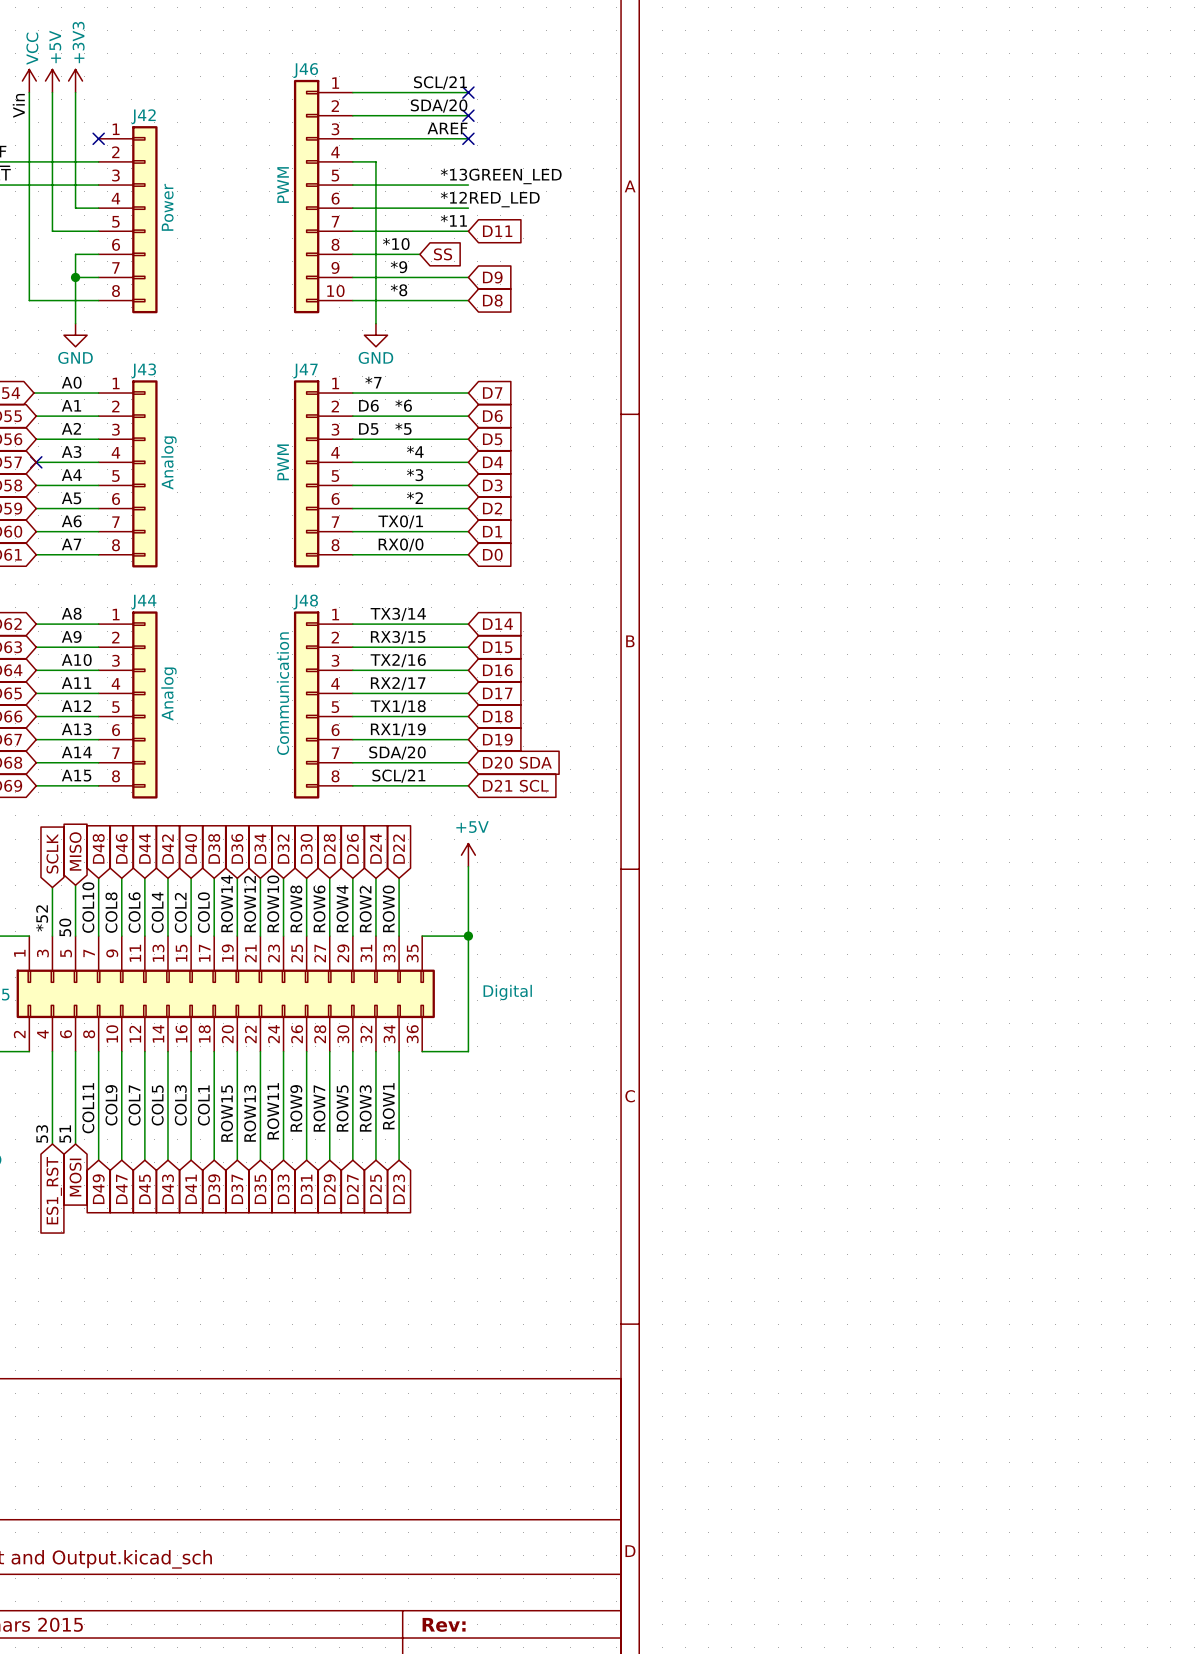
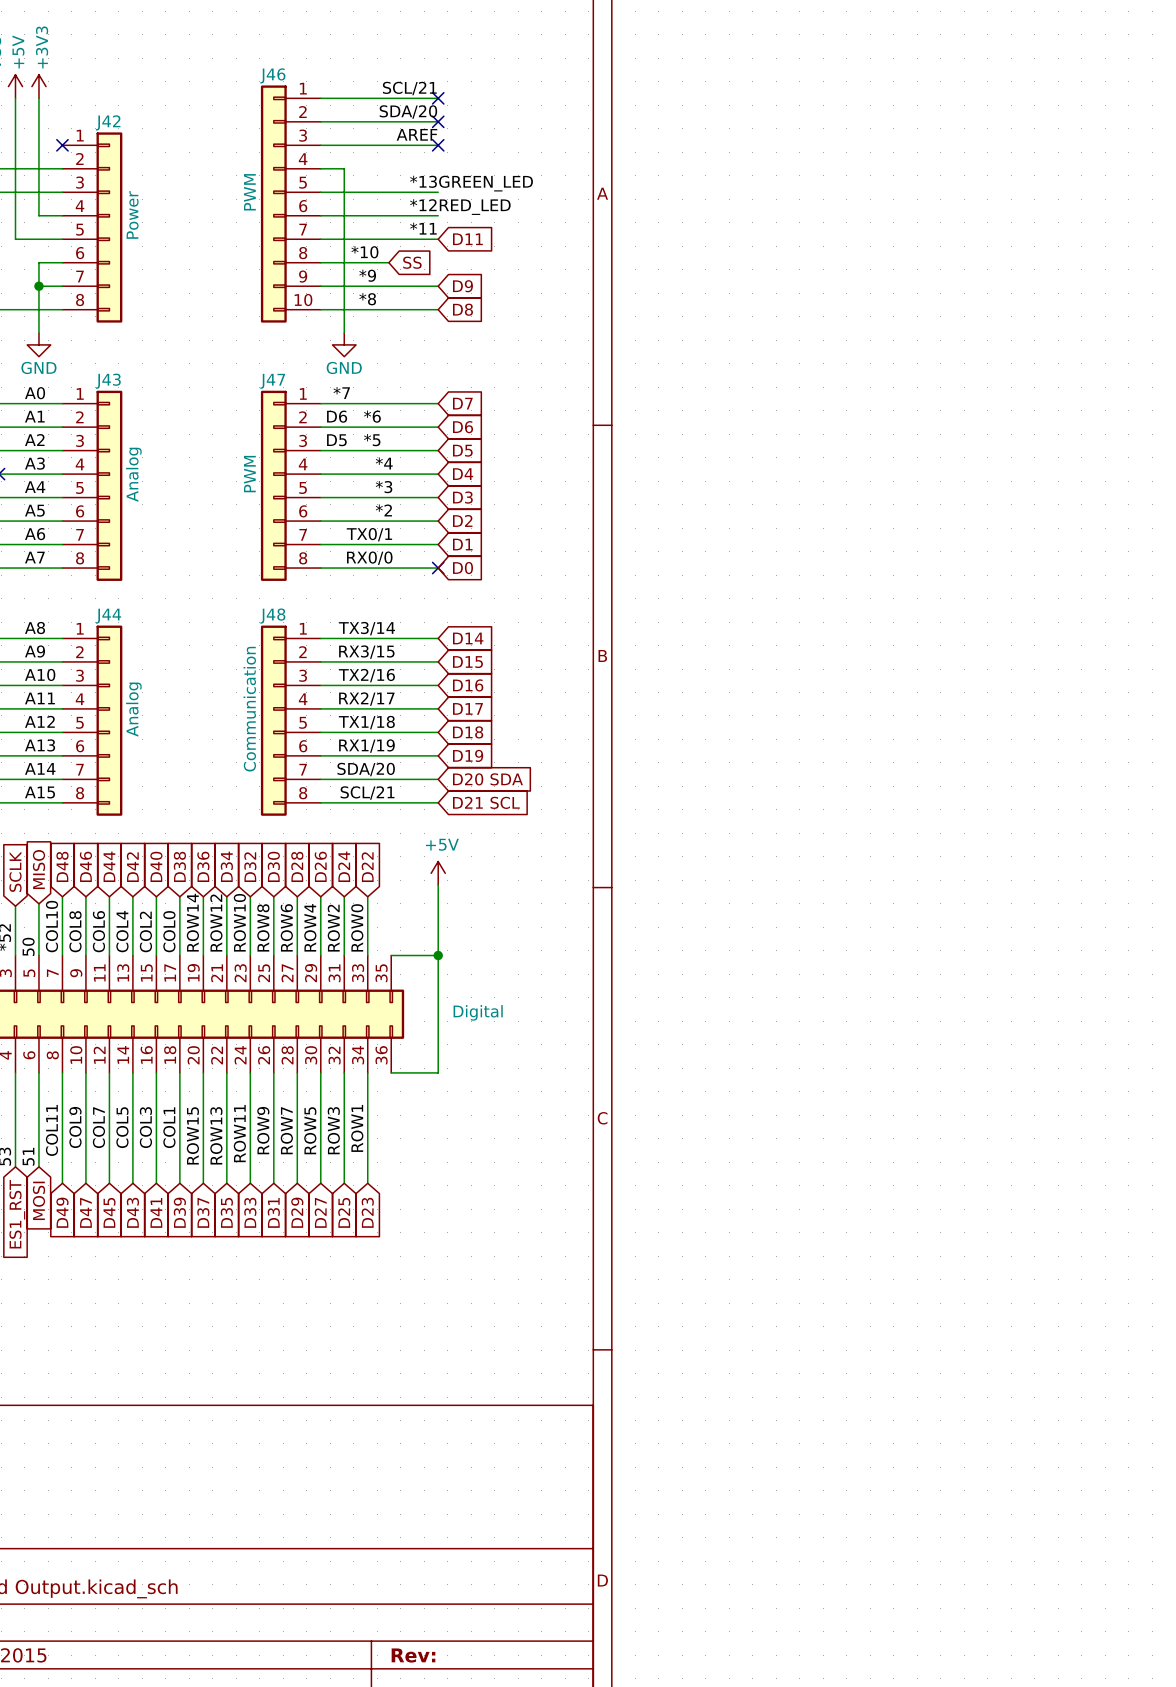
no-connect mark: none -> (438, 568)

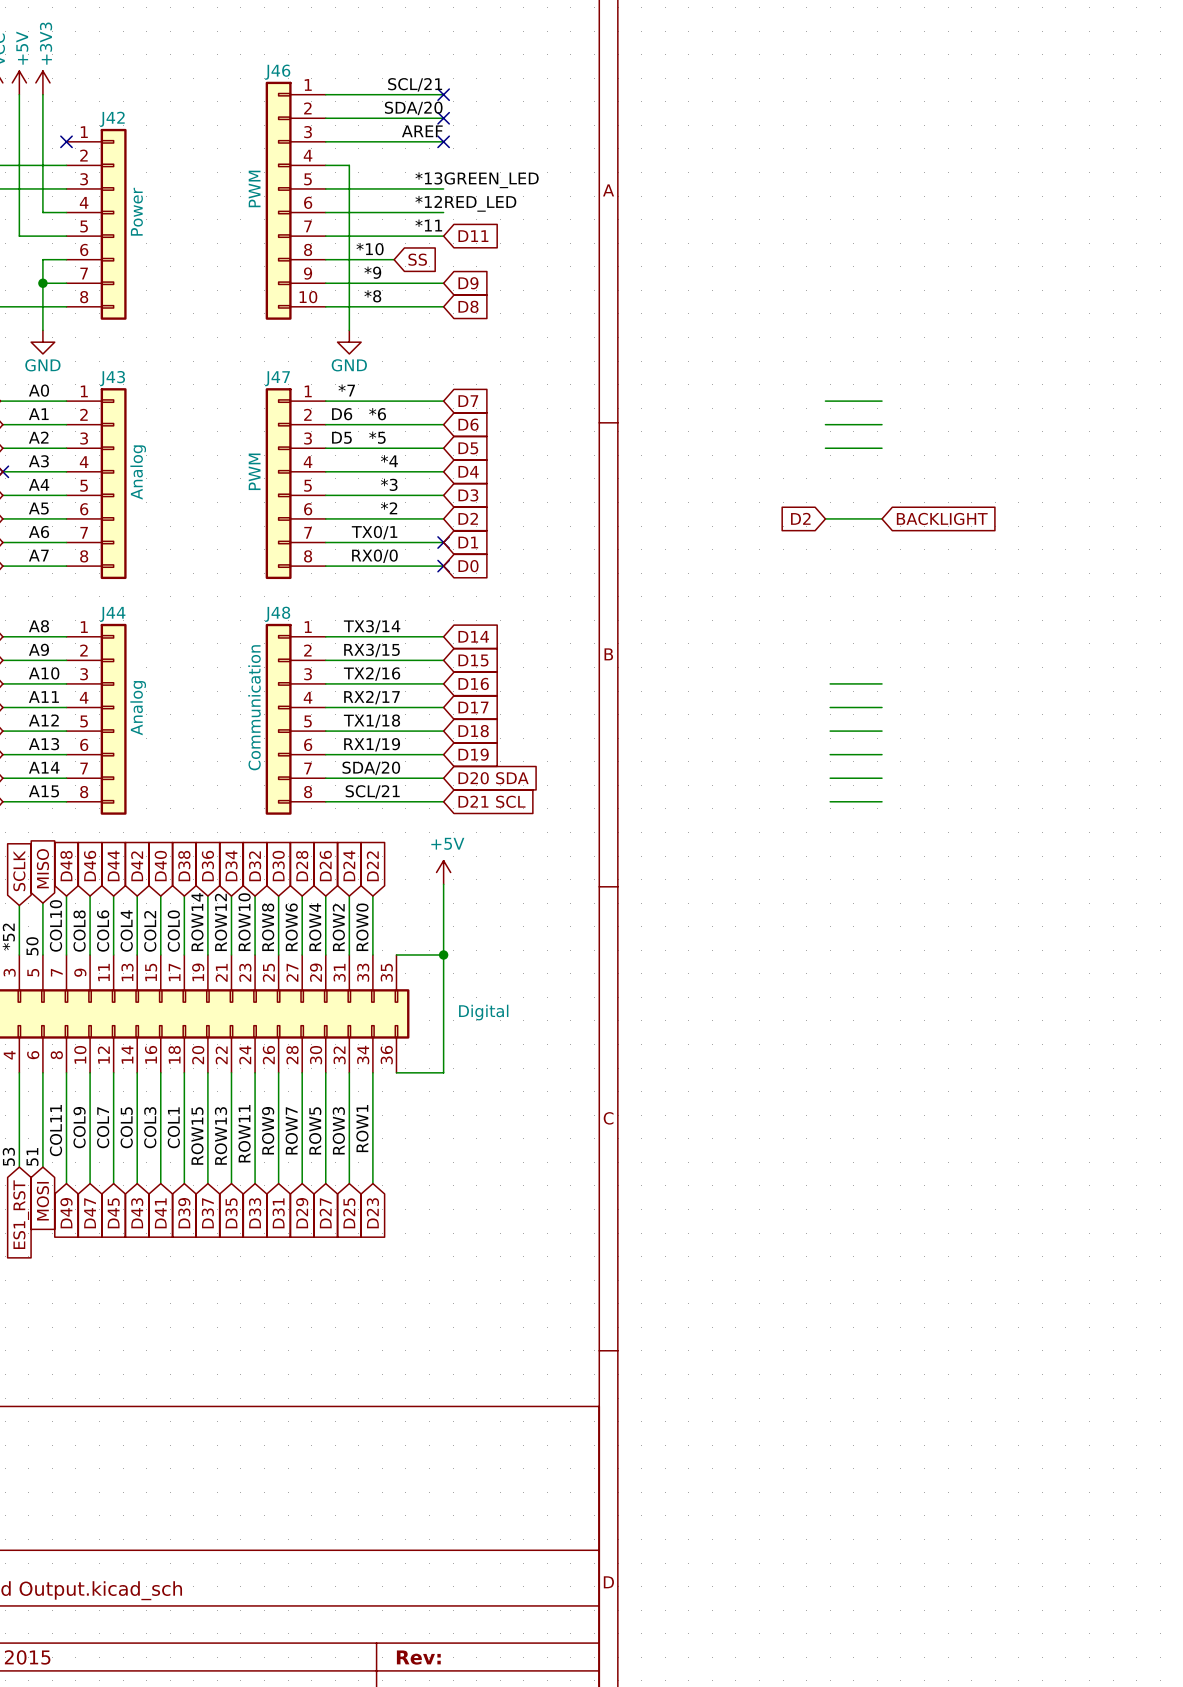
wire: none -> (825, 401) (882, 401)
wire: none -> (825, 424) (882, 424)
wire: none -> (825, 448) (882, 448)
global label: none -> D2 (800, 518)
wire: none -> (825, 518) (882, 518)
global label: none -> BACKLIGHT (942, 518)
no-connect mark: none -> (443, 542)
wire: none -> (830, 683) (882, 683)
wire: none -> (830, 707) (882, 707)
wire: none -> (830, 731) (882, 731)
wire: none -> (830, 754) (882, 754)
wire: none -> (830, 778) (882, 778)
wire: none -> (830, 801) (882, 801)

